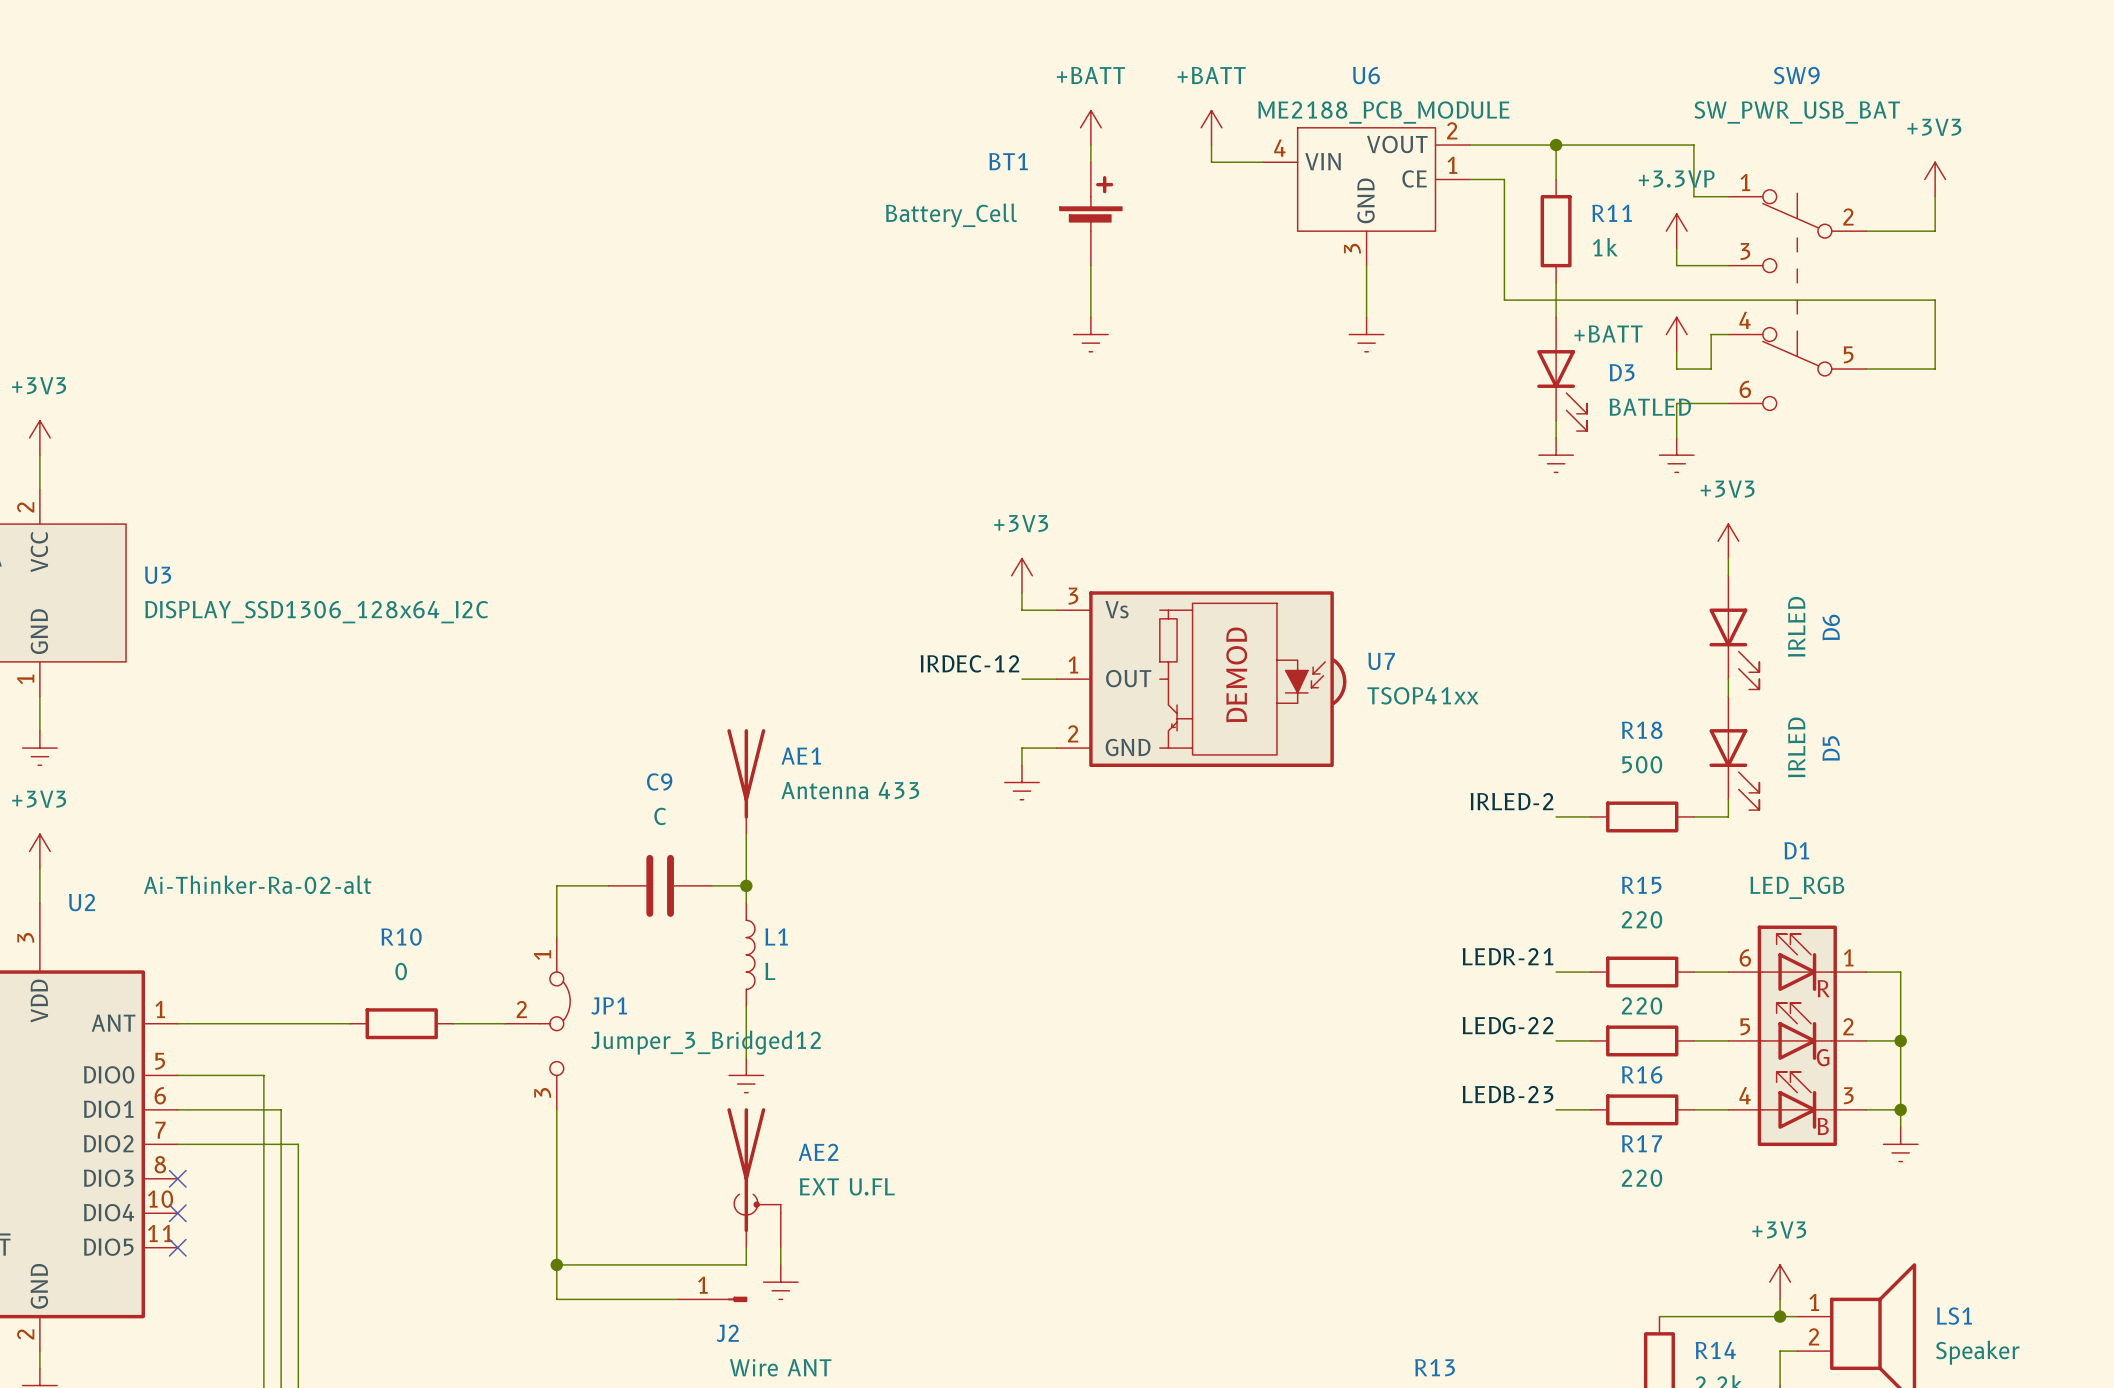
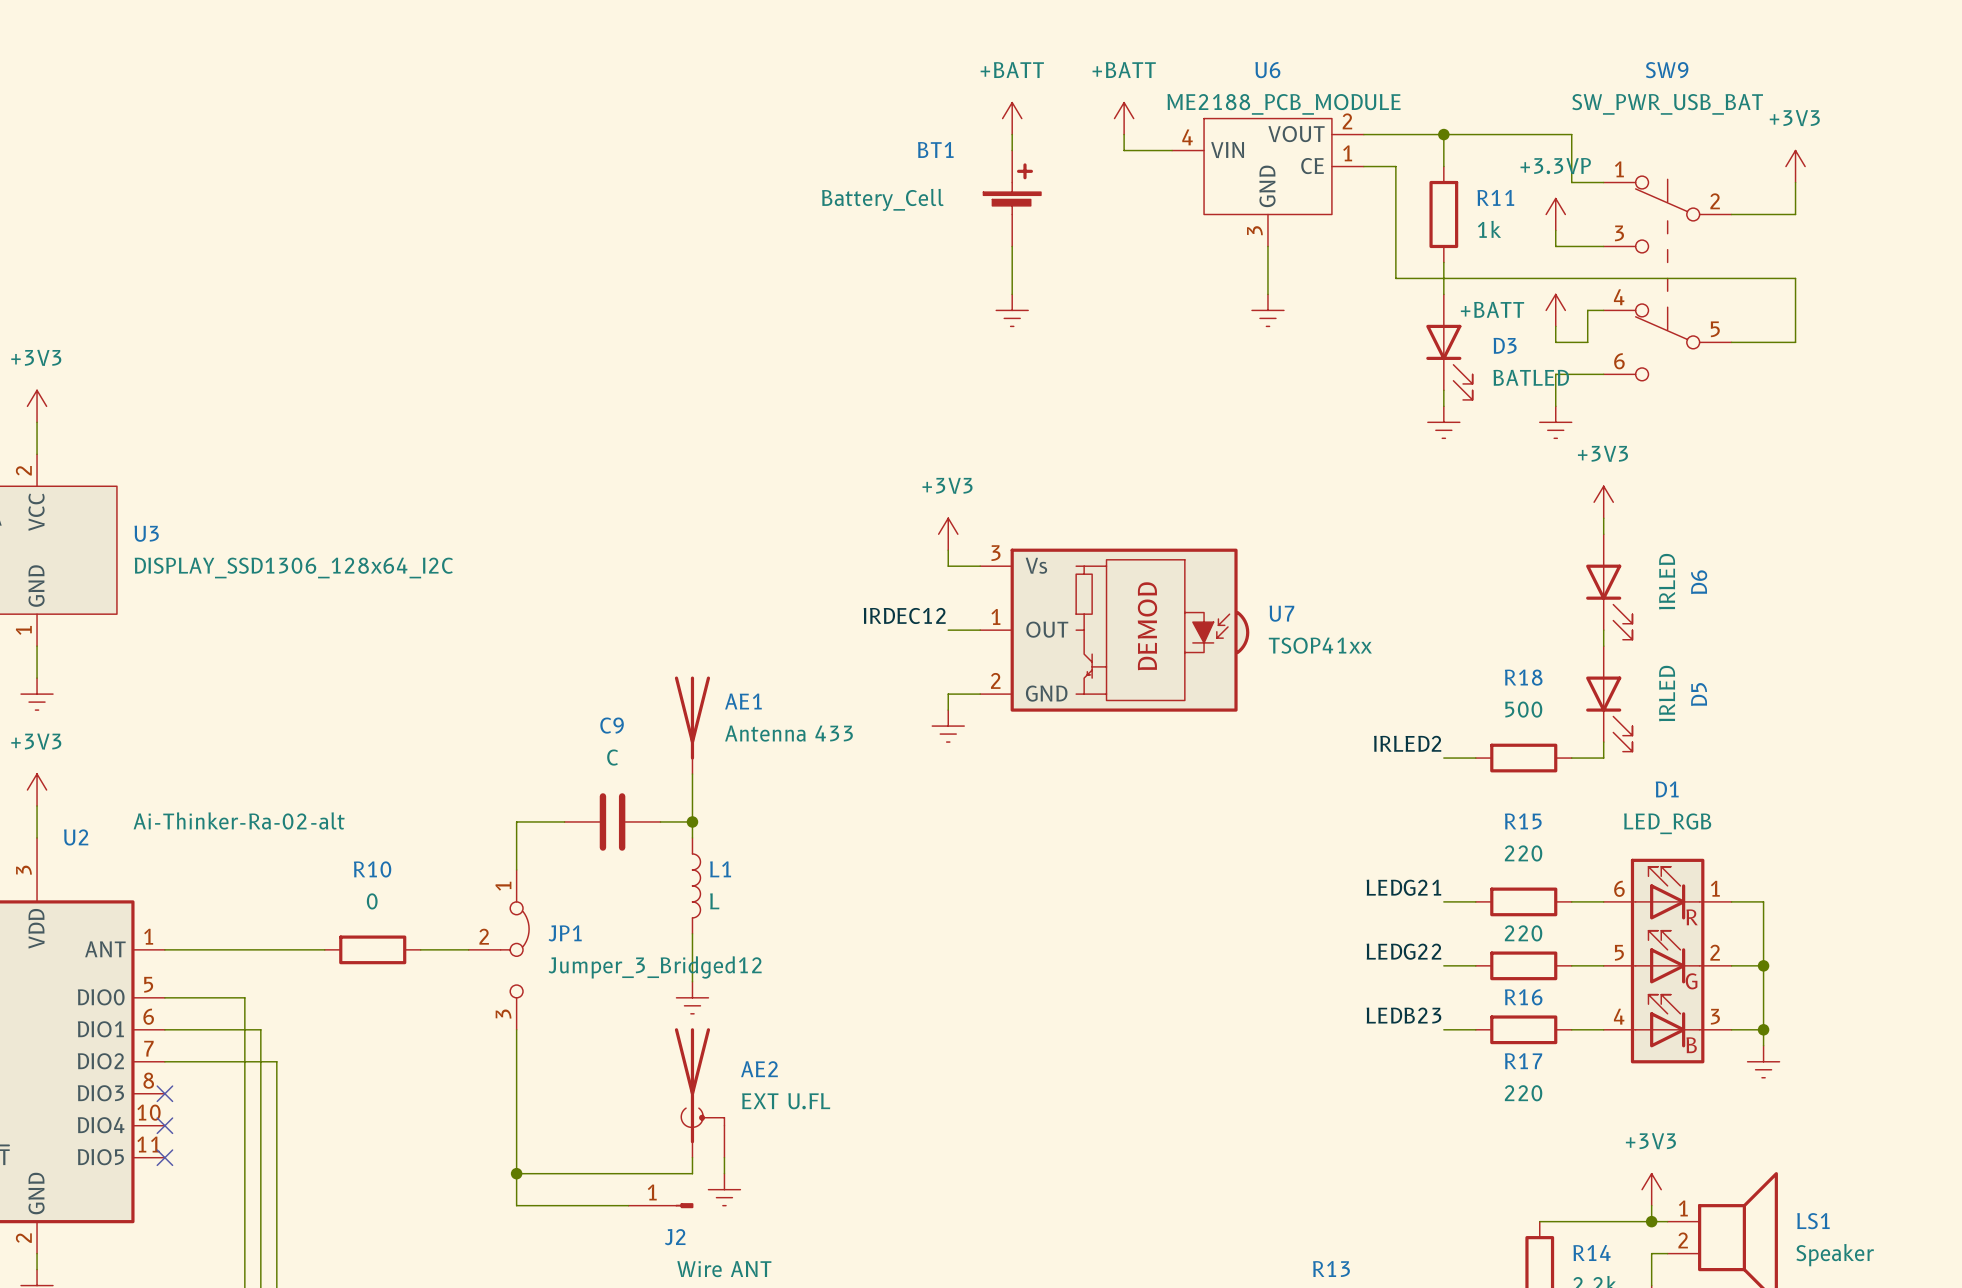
label: IRDEC-12 (969, 663) -> IRDEC12 (904, 615)
label: IRLED-2 (1511, 801) -> IRLED2 (1407, 743)
label: LEDR-21 (1507, 956) -> LEDG21 (1403, 887)
label: LEDG-22 (1508, 1025) -> LEDG22 (1403, 951)
label: LEDB-23 (1508, 1094) -> LEDB23 (1403, 1015)

